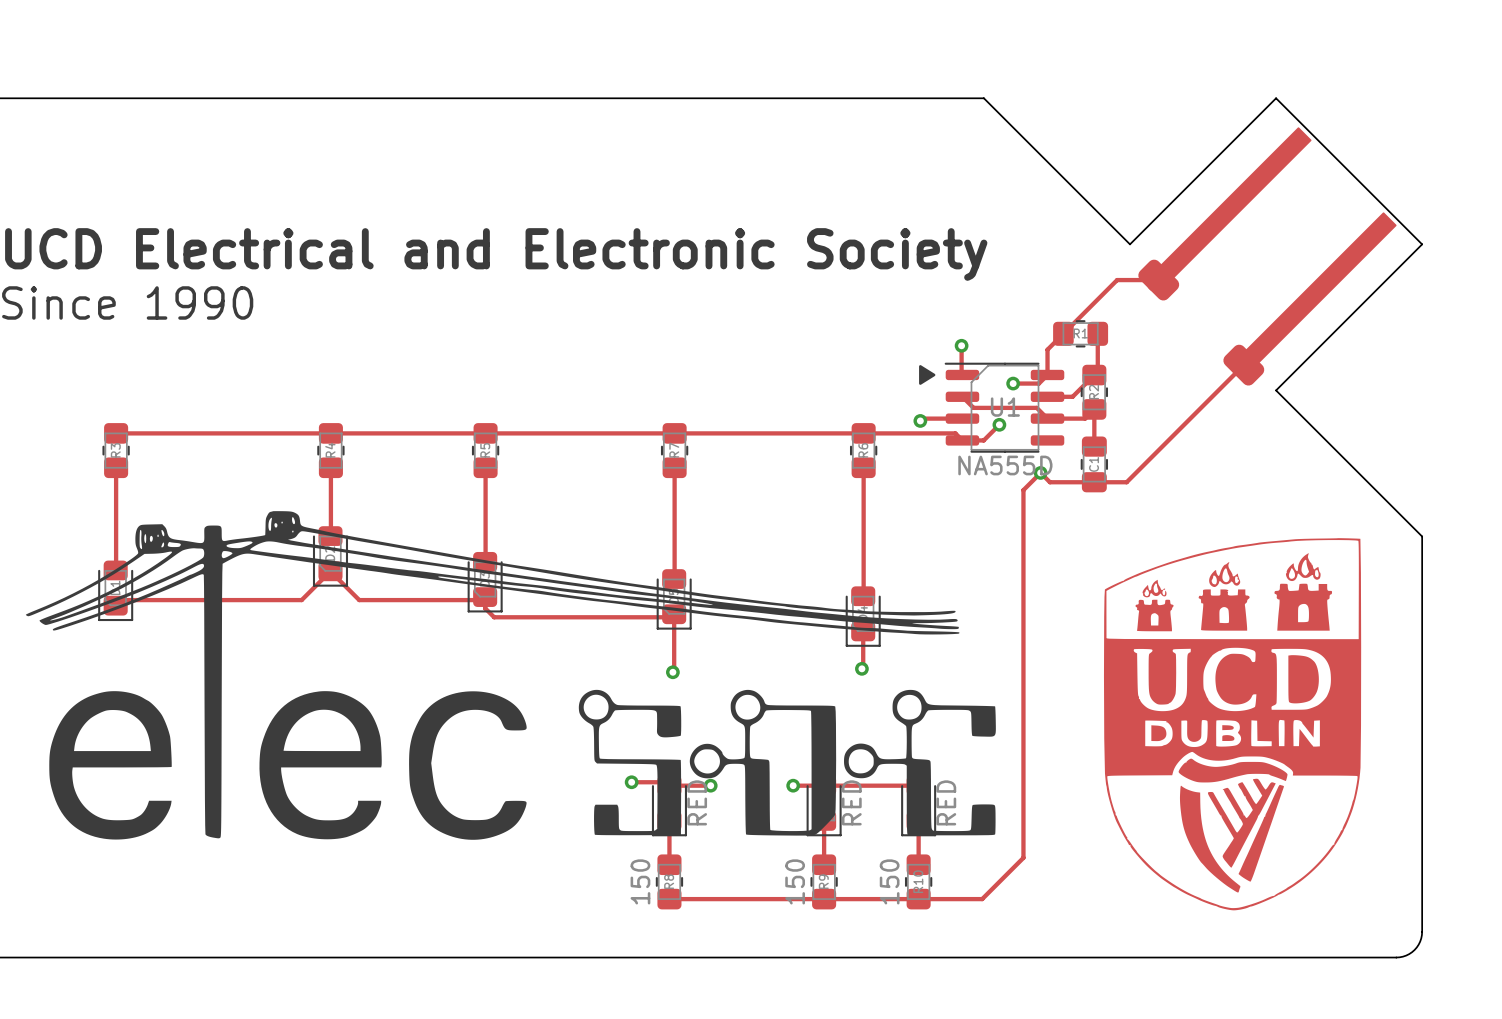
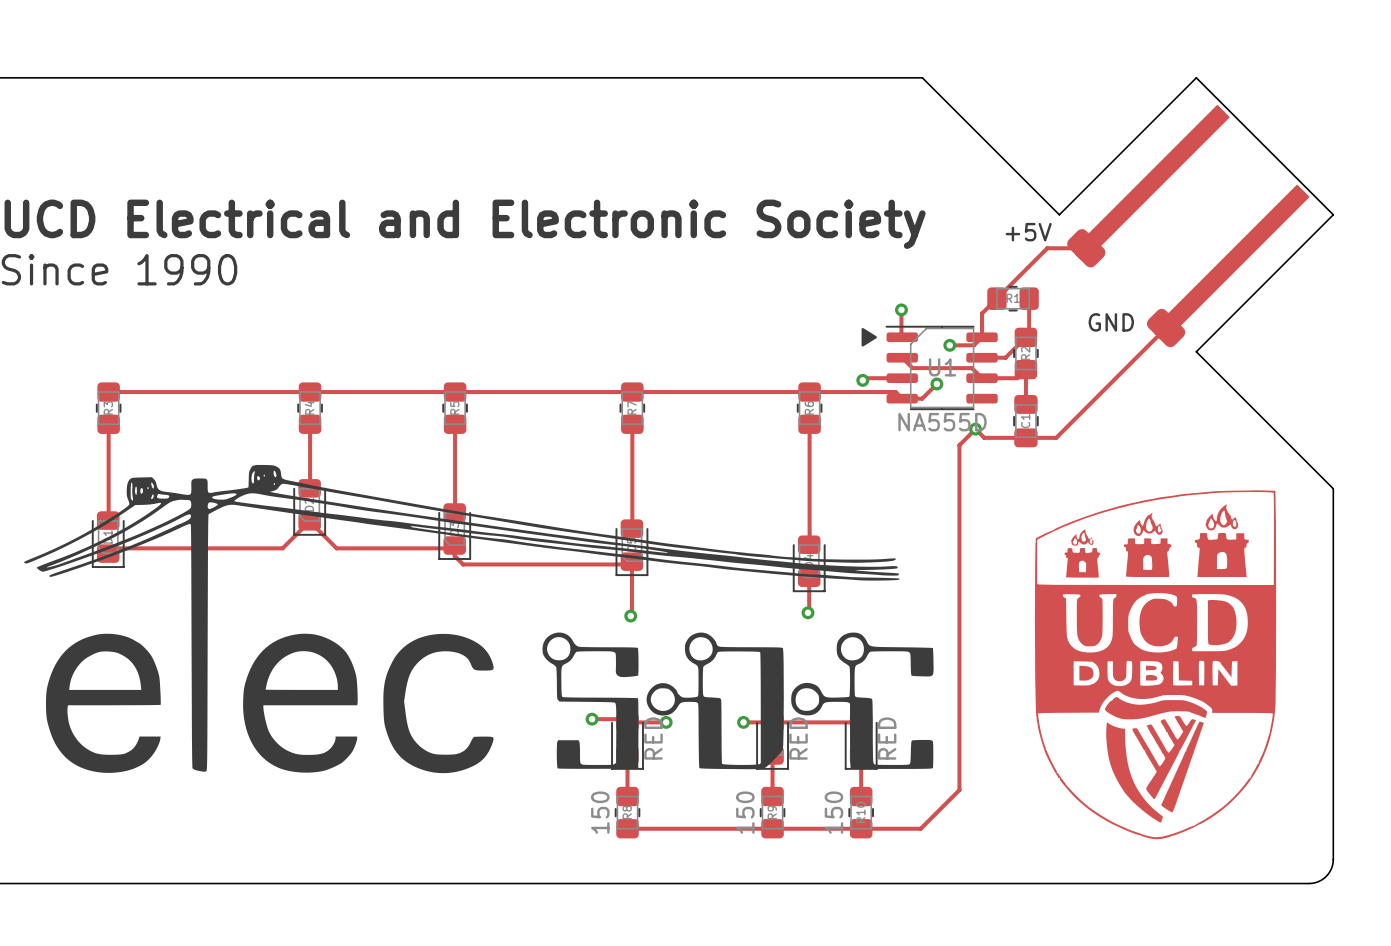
text: none -> +5V (1028, 232)
text: none -> GND (1111, 322)

